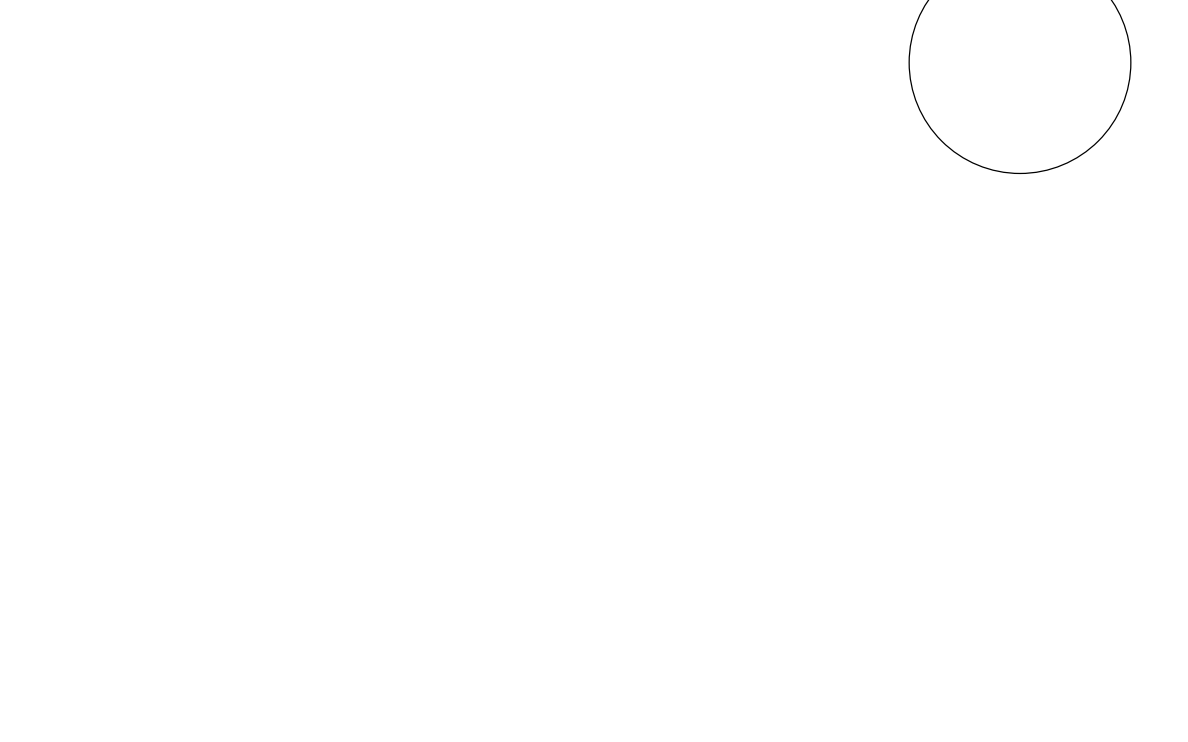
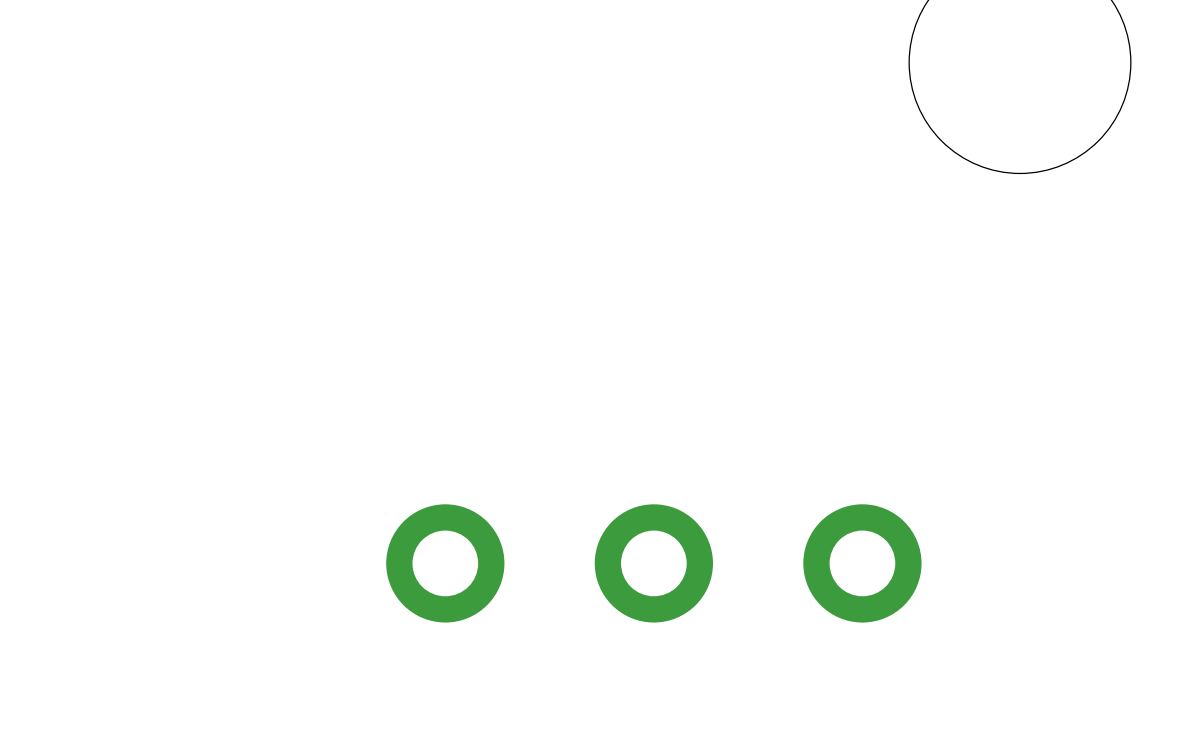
part: none -> (653, 563)

